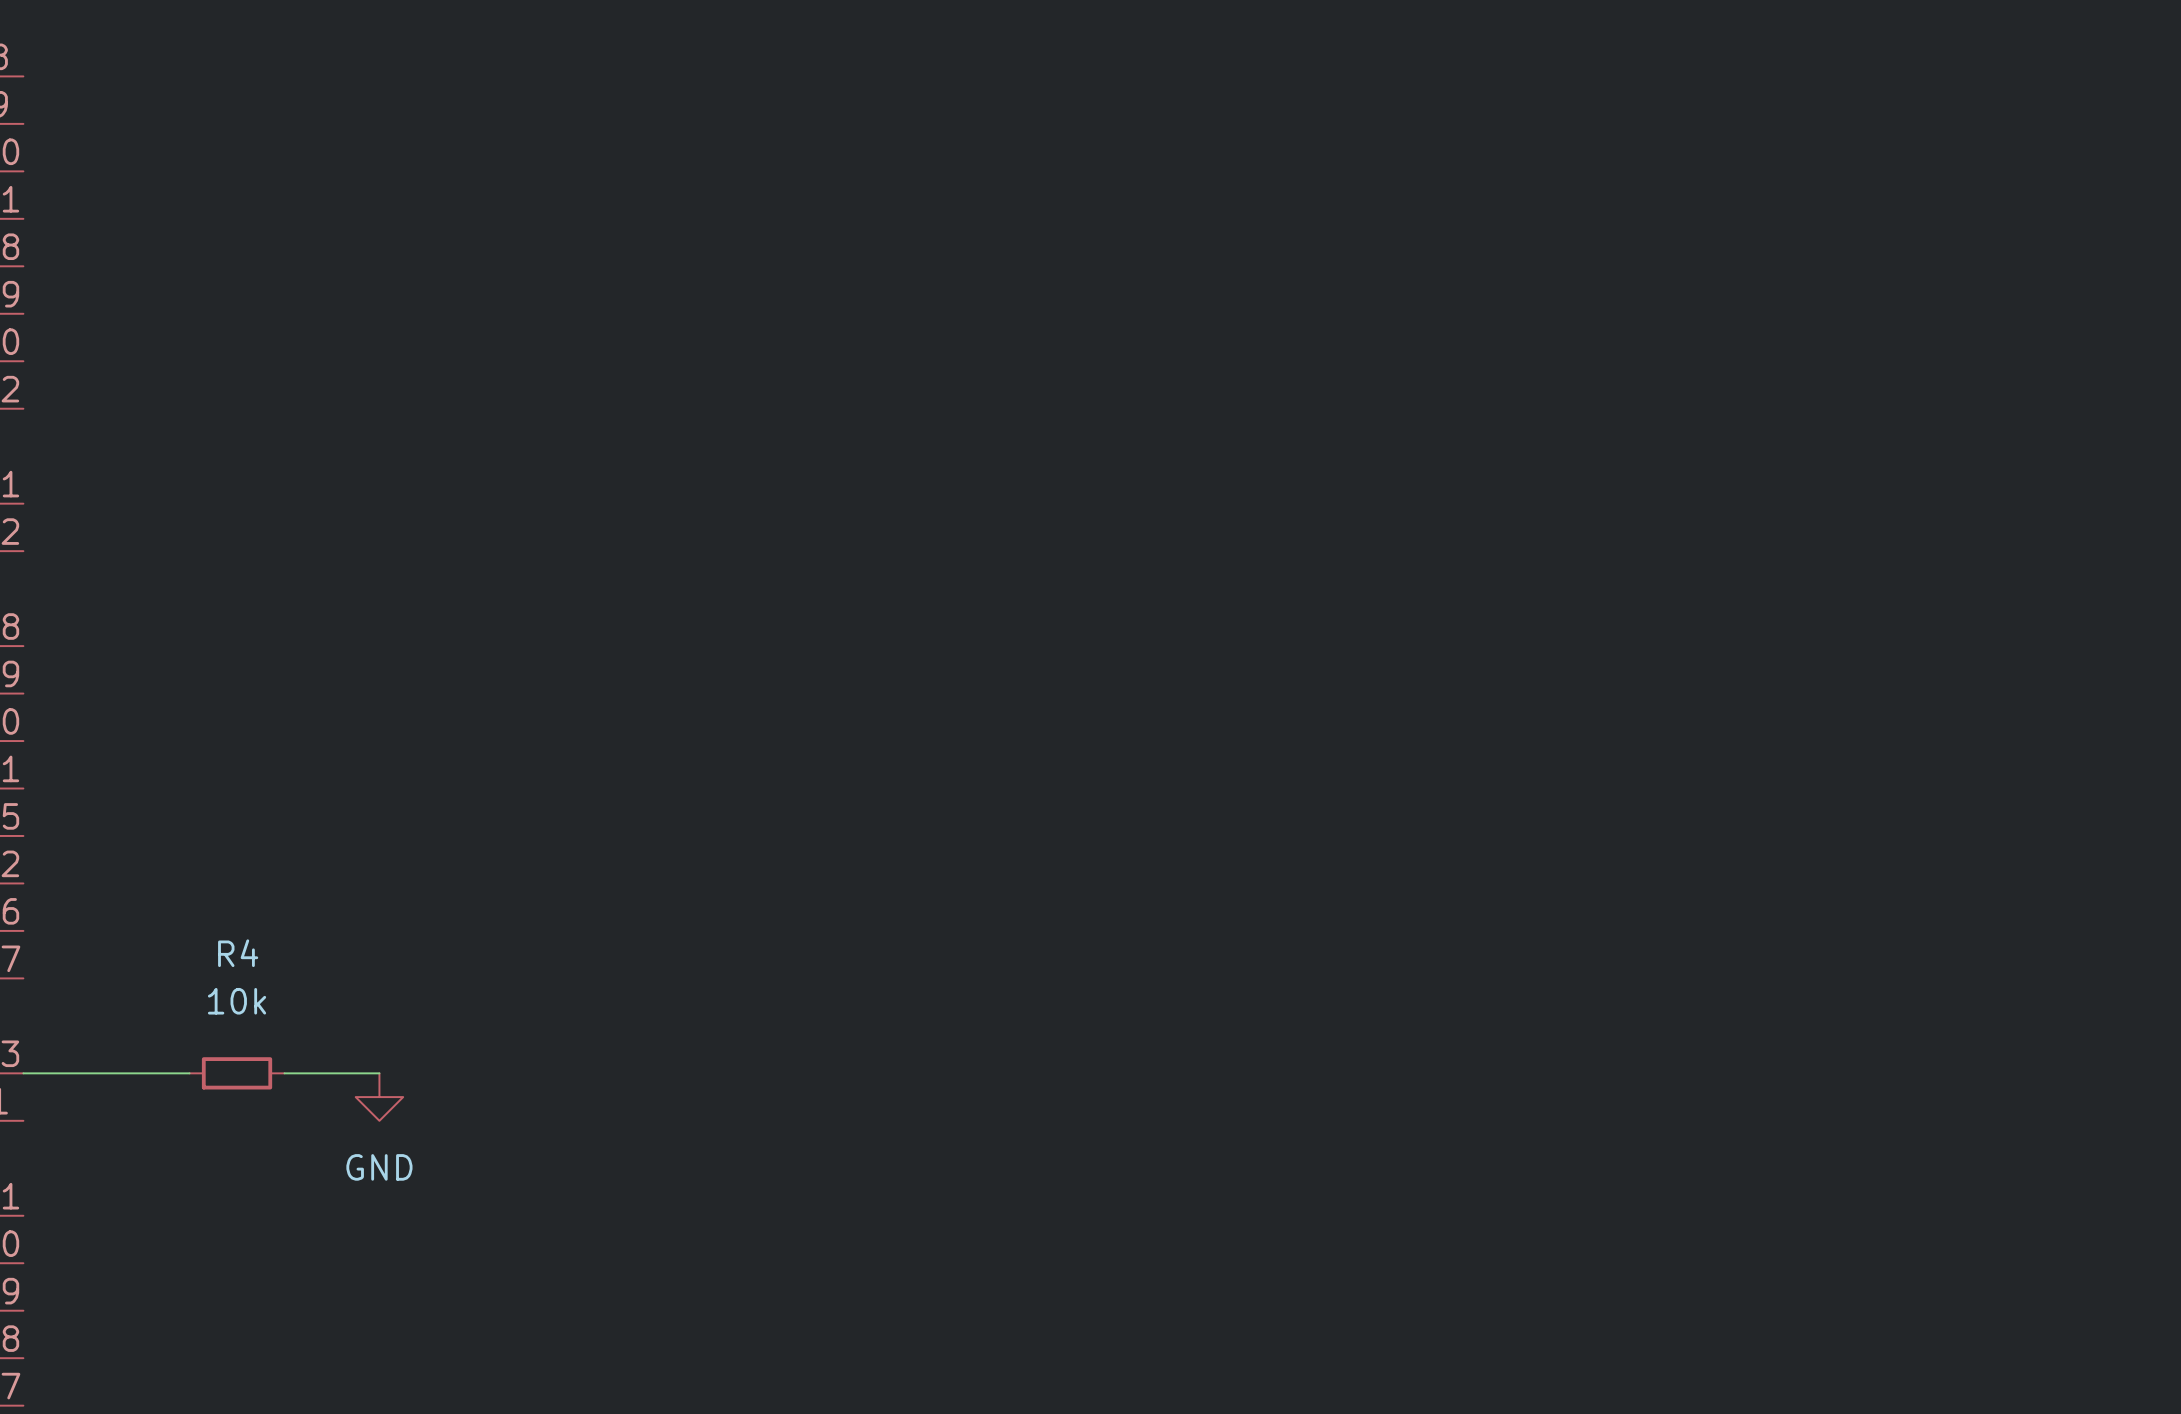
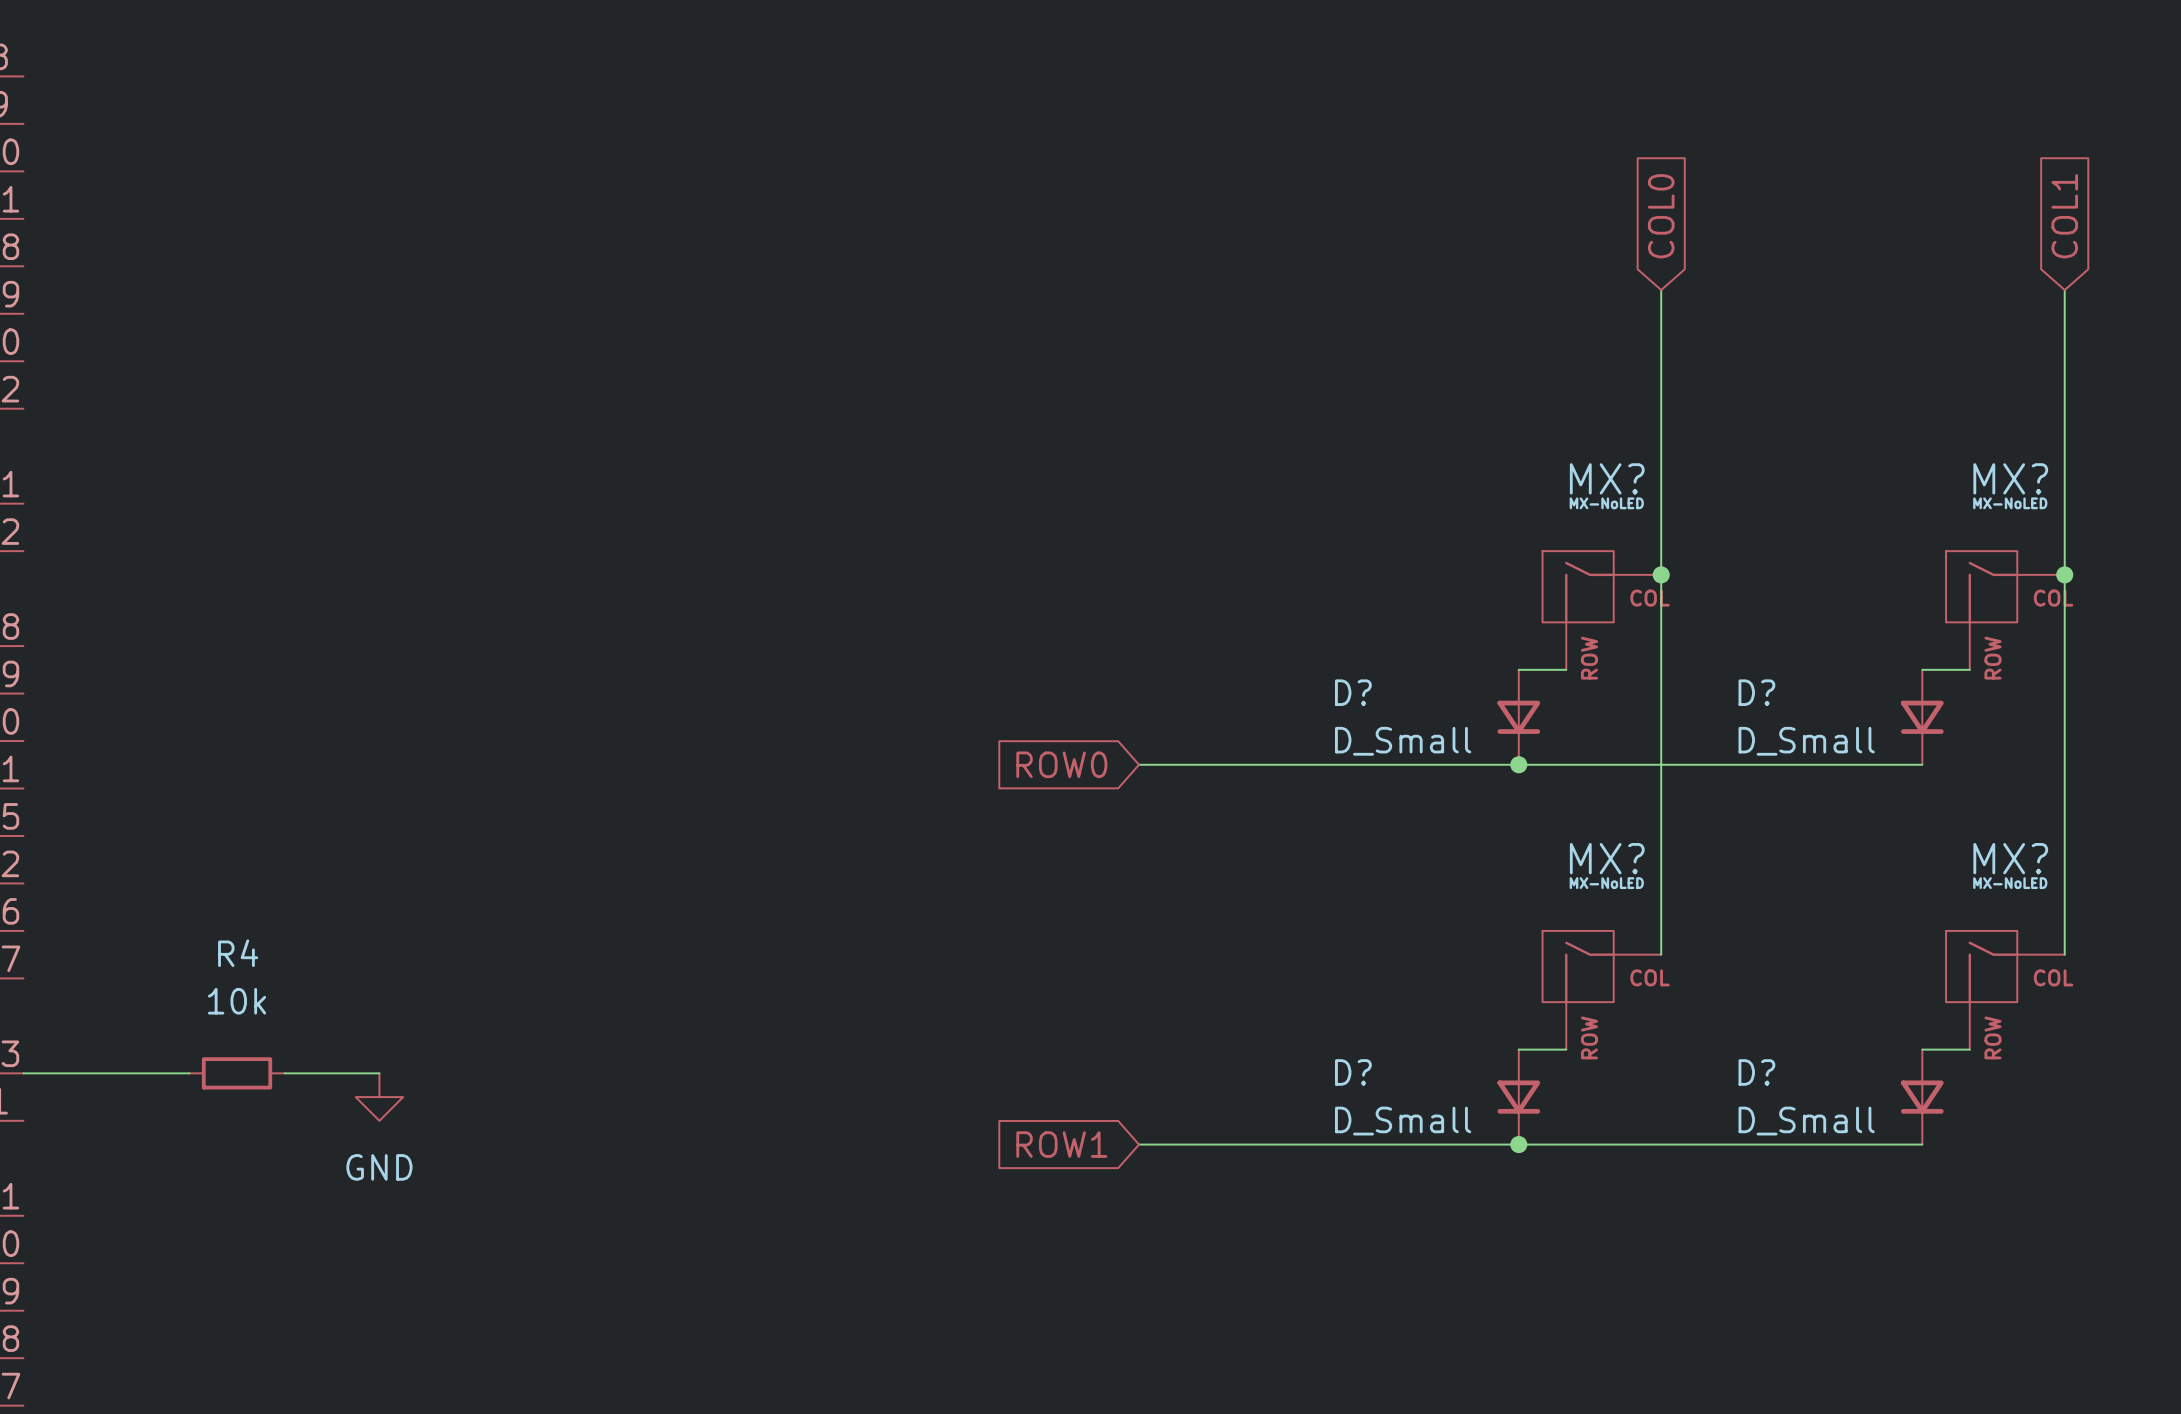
global label: none -> COL0 (1661, 216)
global label: none -> COL1 (2064, 216)
wire: none -> (1661, 290) (1661, 954)
wire: none -> (2064, 290) (2064, 954)
junction: none -> (1661, 574)
junction: none -> (2064, 574)
MX?: none -> MX-NoLED (1601, 610)
MX?: none -> MX-NoLED (2005, 610)
wire: none -> (1518, 669) (1566, 669)
wire: none -> (1922, 669) (1969, 669)
D?: none -> D_Small (1518, 717)
D?: none -> D_Small (1922, 717)
global label: none -> ROW0 (1061, 764)
wire: none -> (1139, 764) (1922, 764)
junction: none -> (1518, 764)
MX?: none -> MX-NoLED (1601, 990)
MX?: none -> MX-NoLED (2005, 990)
wire: none -> (1518, 1049) (1566, 1049)
wire: none -> (1922, 1049) (1969, 1049)
D?: none -> D_Small (1518, 1097)
D?: none -> D_Small (1922, 1097)
global label: none -> ROW1 (1061, 1144)
wire: none -> (1139, 1144) (1922, 1144)
junction: none -> (1518, 1144)

